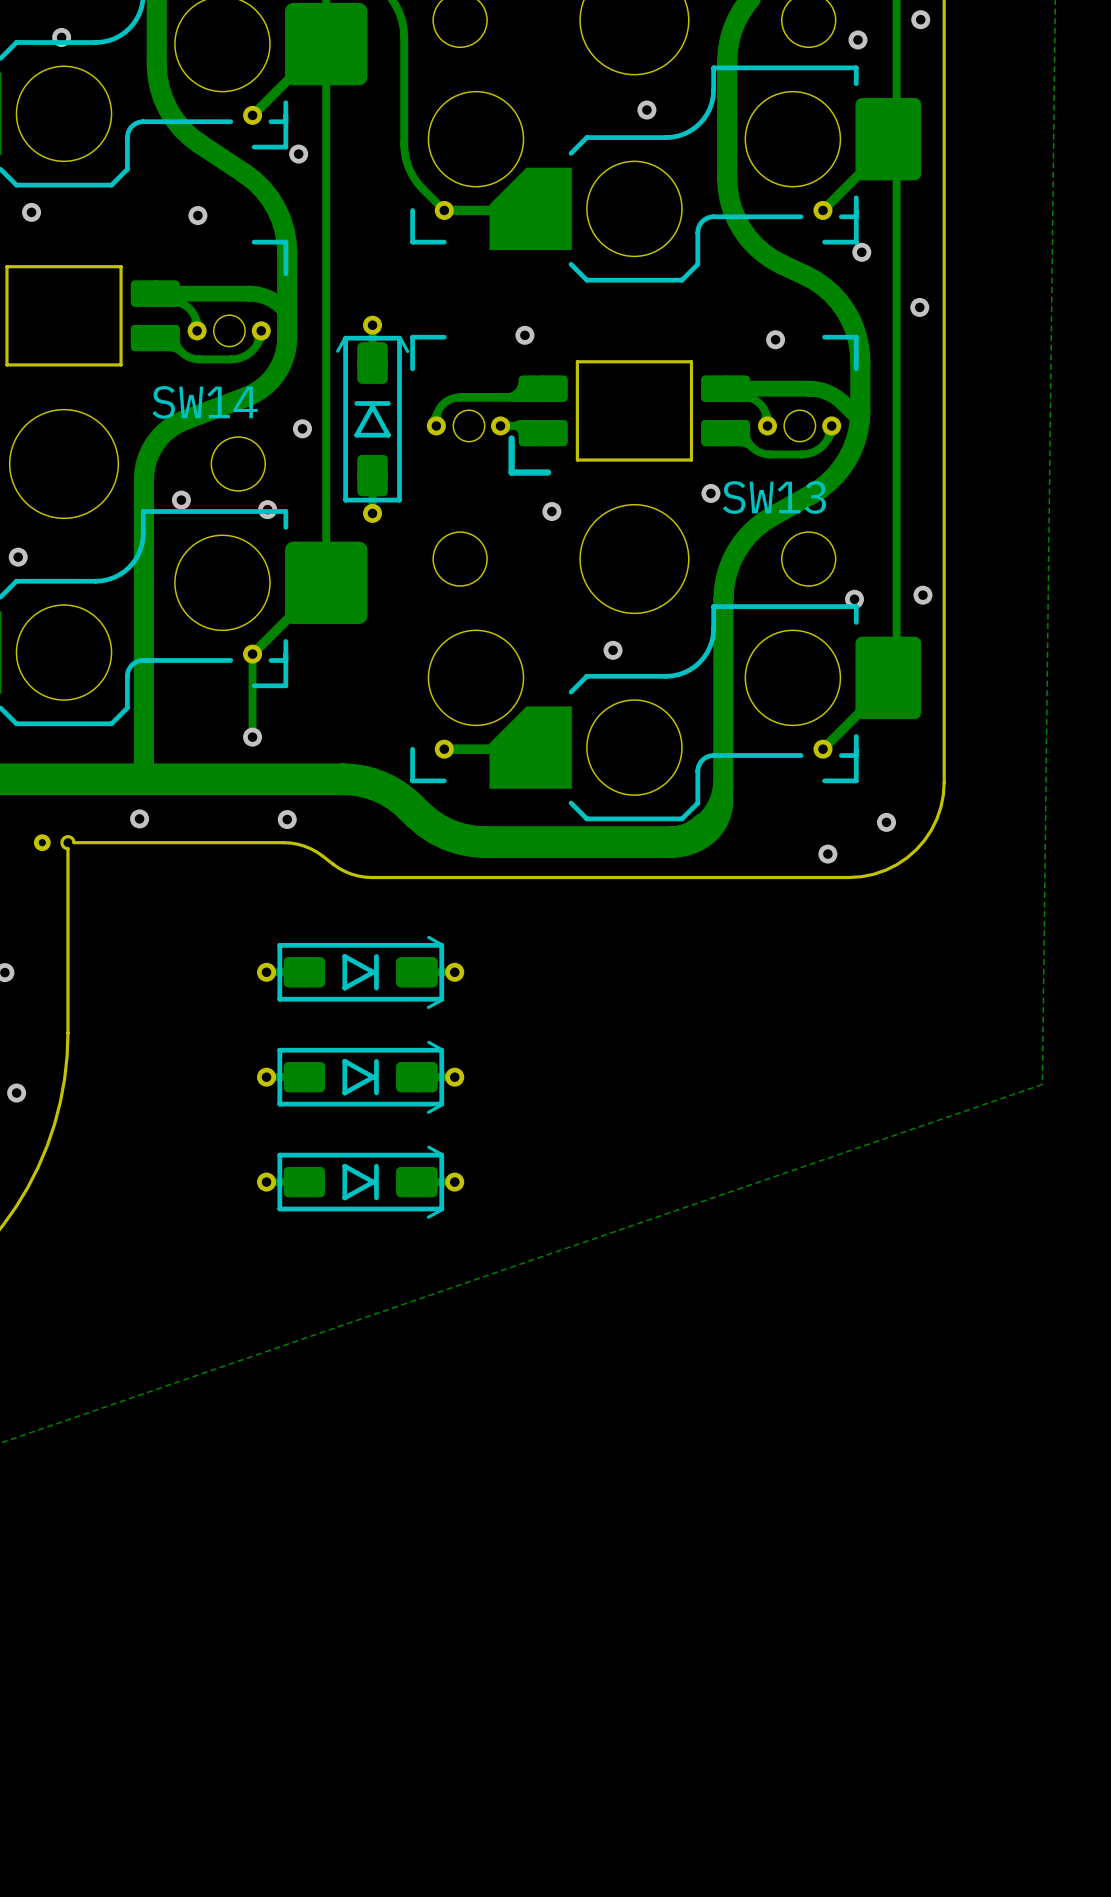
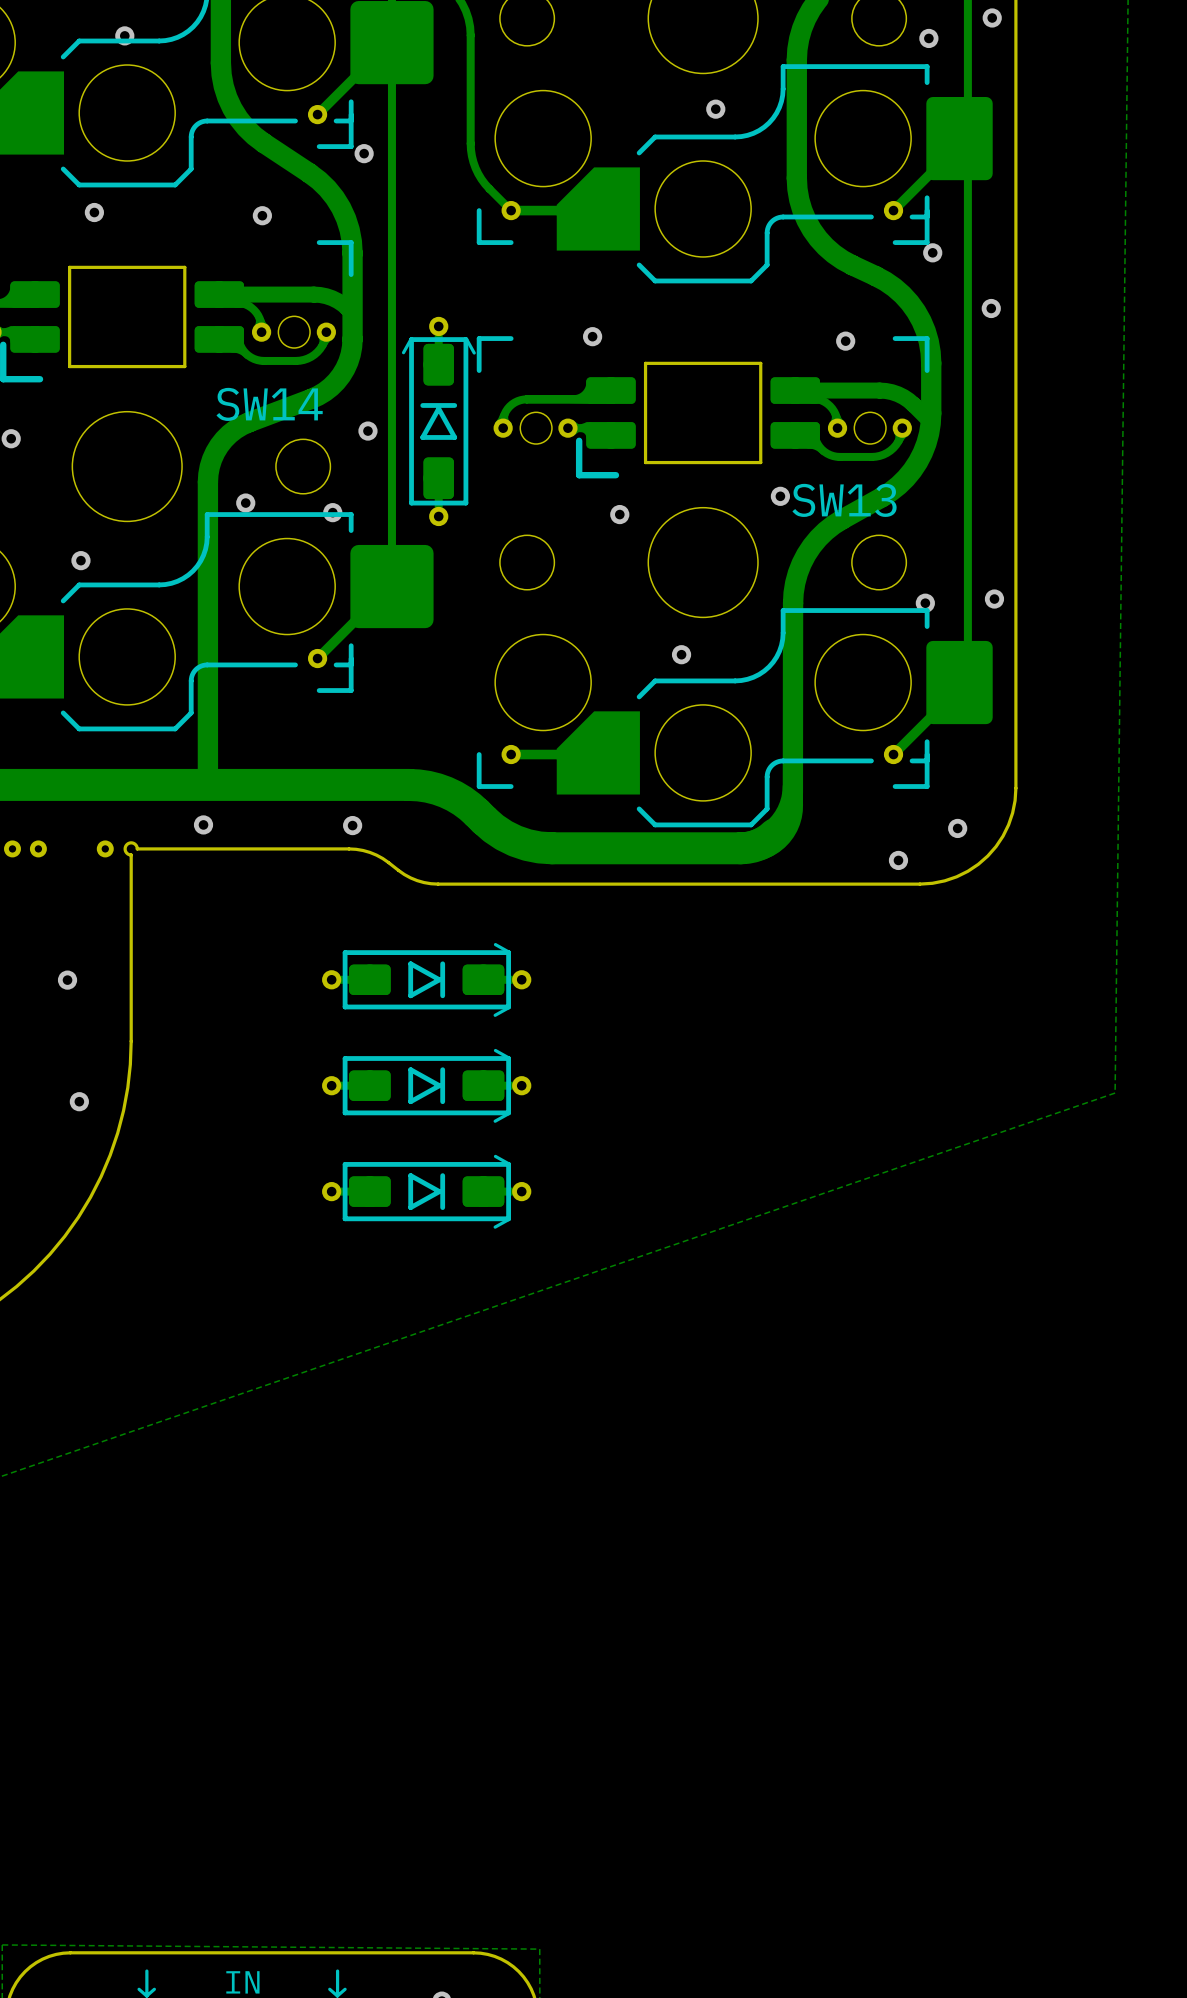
track: (252, 654) (252, 737) -> none
via: (252, 737) -> none

